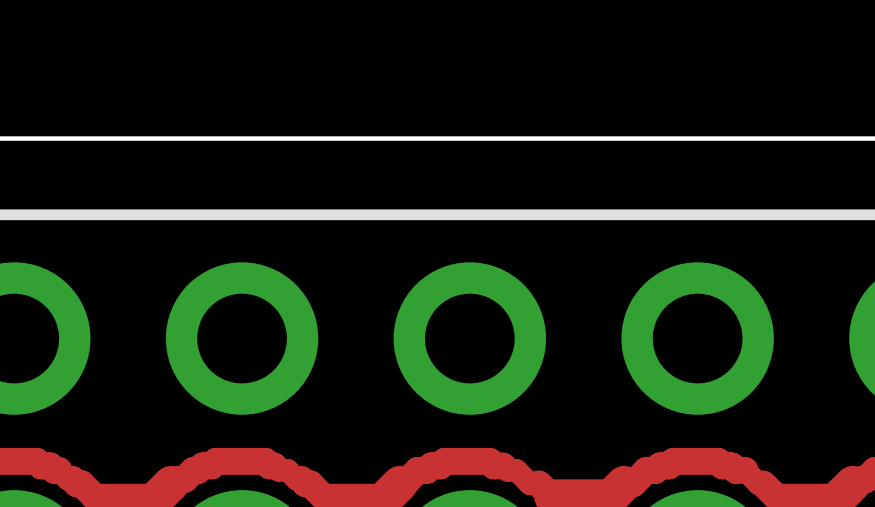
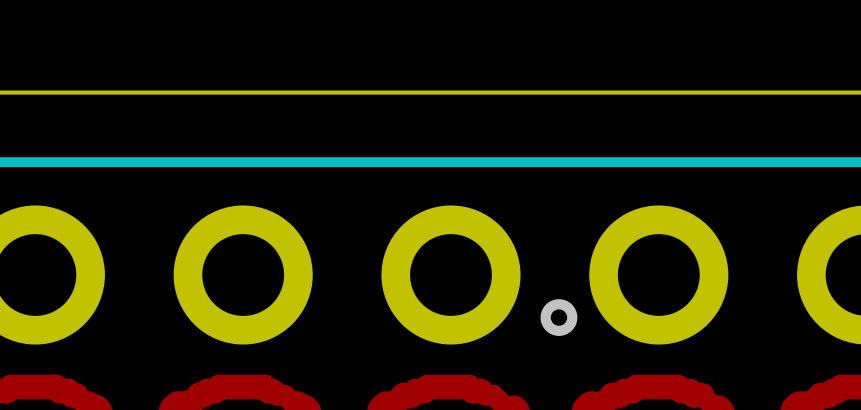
via: none -> (558, 317)

